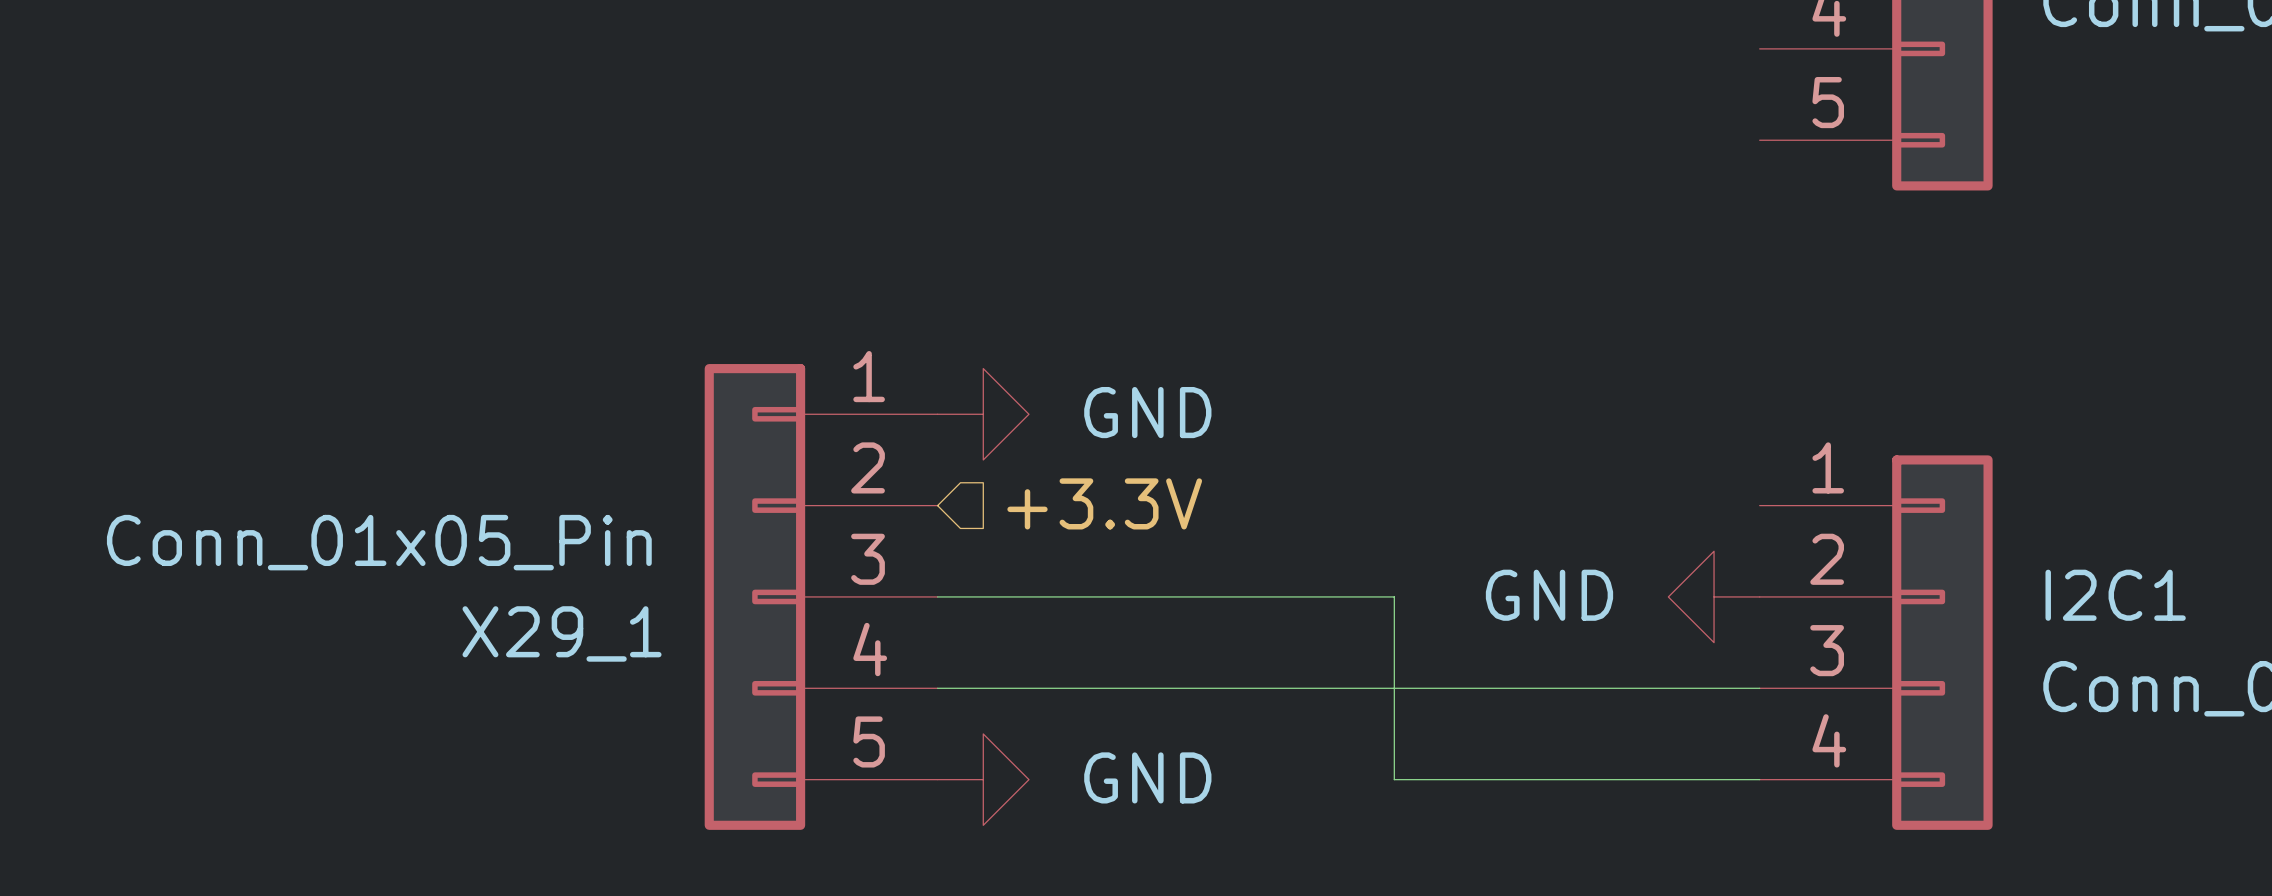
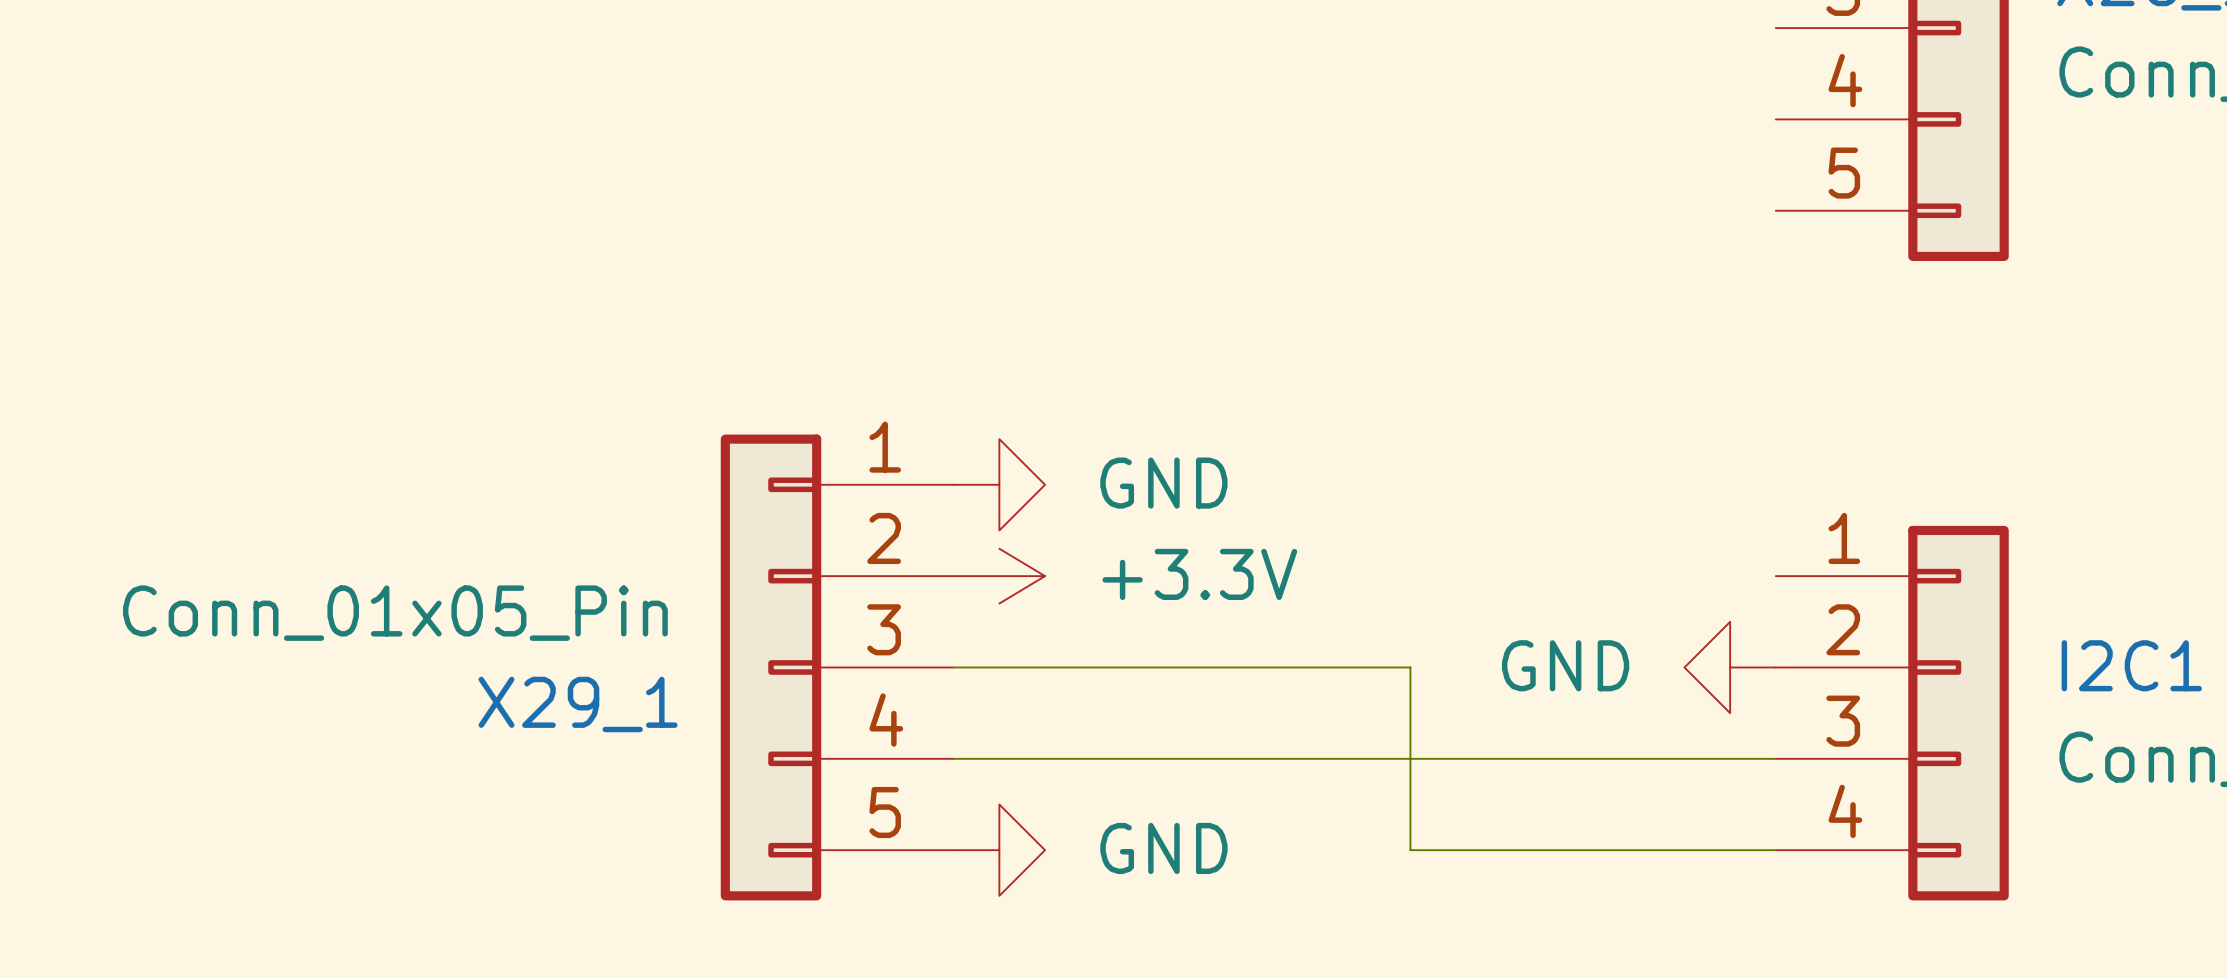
hierarchical label: +3.3V (1104, 503) -> none
power symbol: none -> +3.3V (999, 576)

